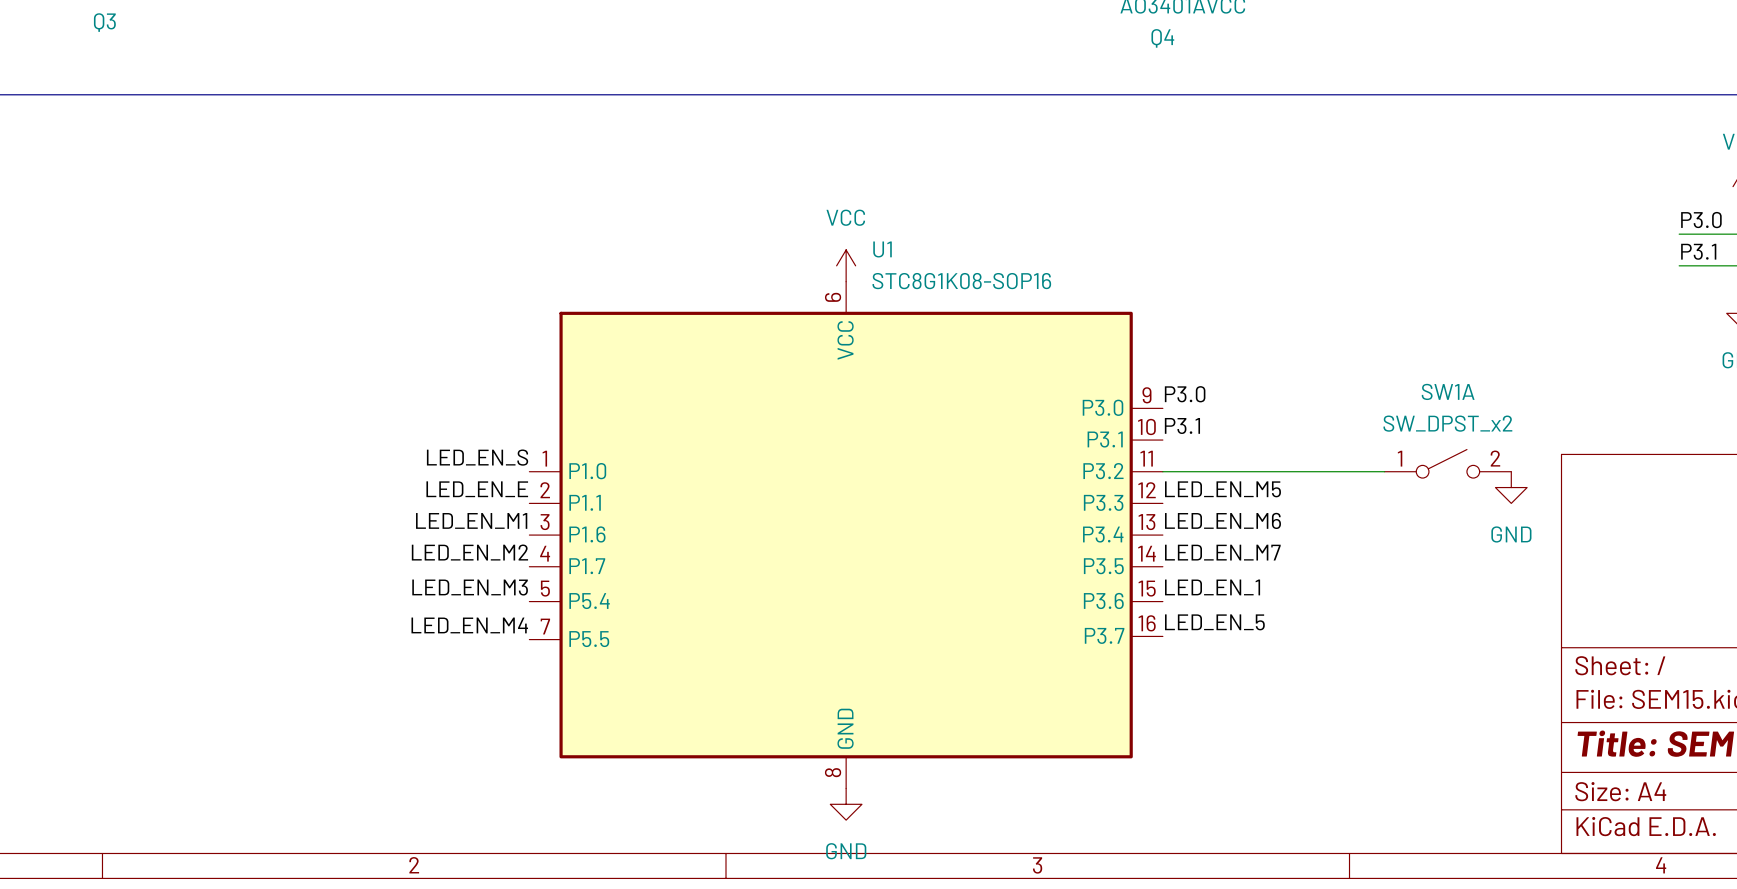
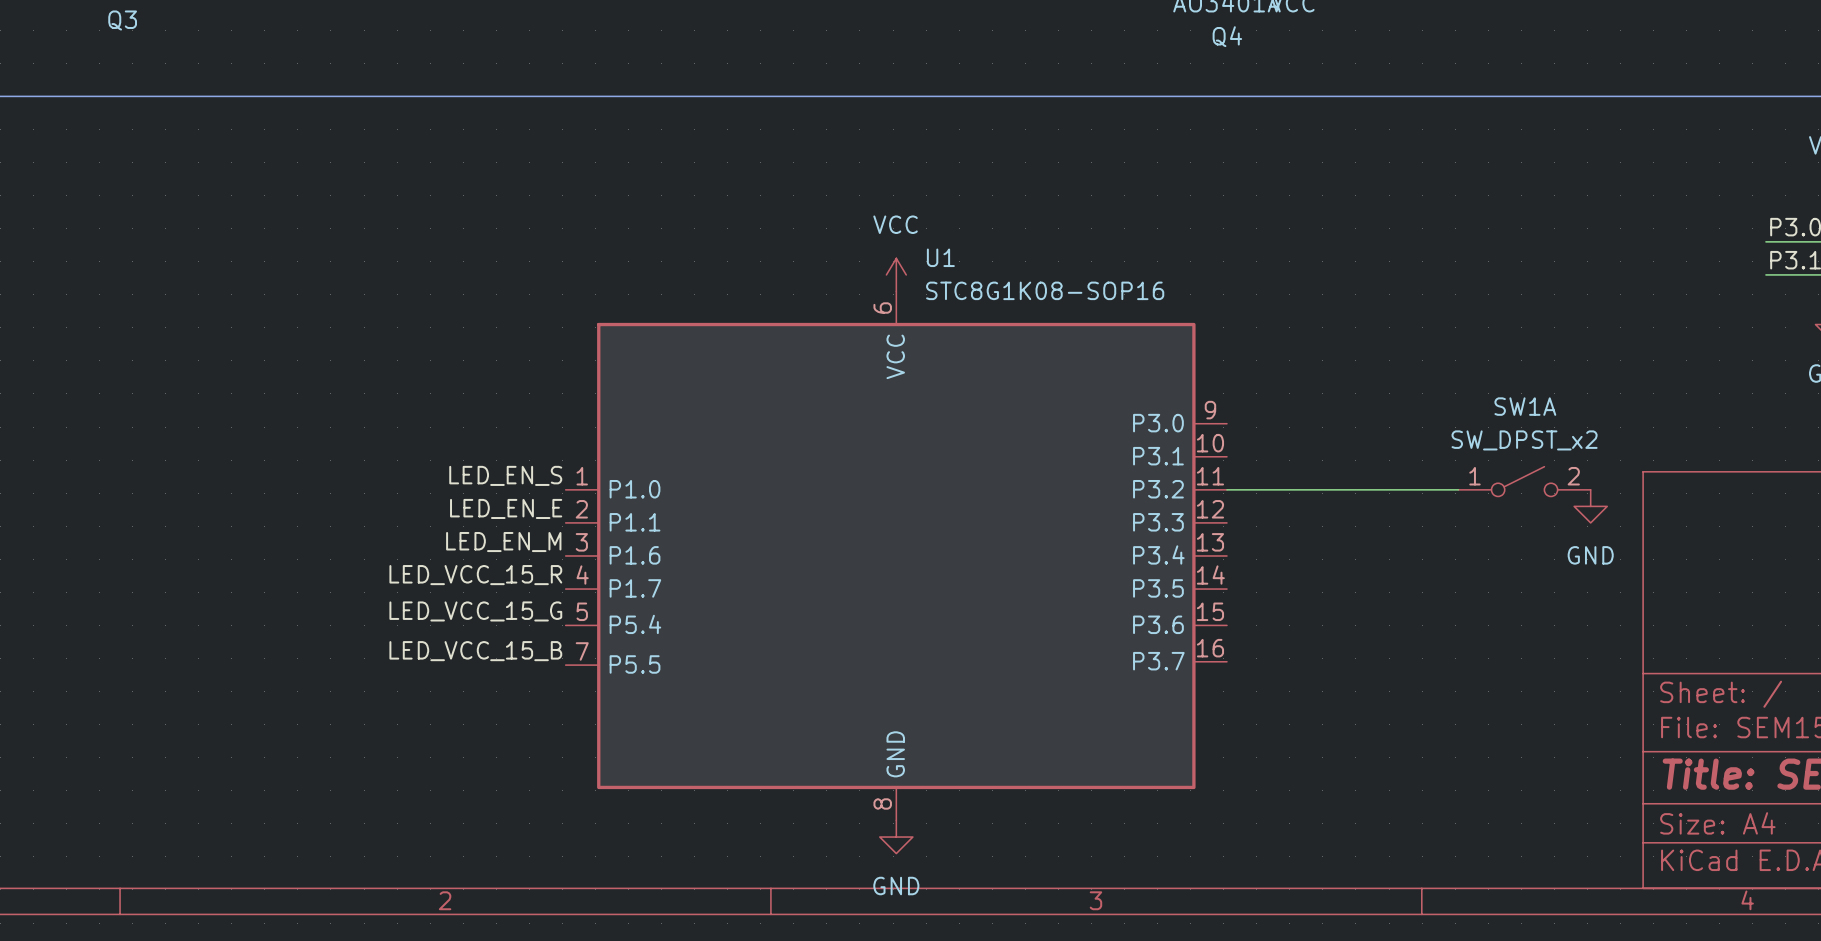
label: P3.0 (1185, 394) -> none
label: P3.1 (1182, 425) -> none
label: LED_EN_M5 (1222, 489) -> none
label: LED_EN_M1 (471, 520) -> LED_EN_M (503, 542)
label: LED_EN_M6 (1222, 520) -> none
label: LED_EN_M2 (469, 552) -> LED_VCC_15_R (475, 575)
label: LED_EN_M7 (1222, 552) -> none
label: LED_EN_M3 (470, 587) -> LED_VCC_15_G (475, 611)
label: LED_EN_1 (1212, 587) -> none
label: LED_EN_5 (1214, 622) -> none
label: LED_EN_M4 (469, 625) -> LED_VCC_15_B (475, 651)

